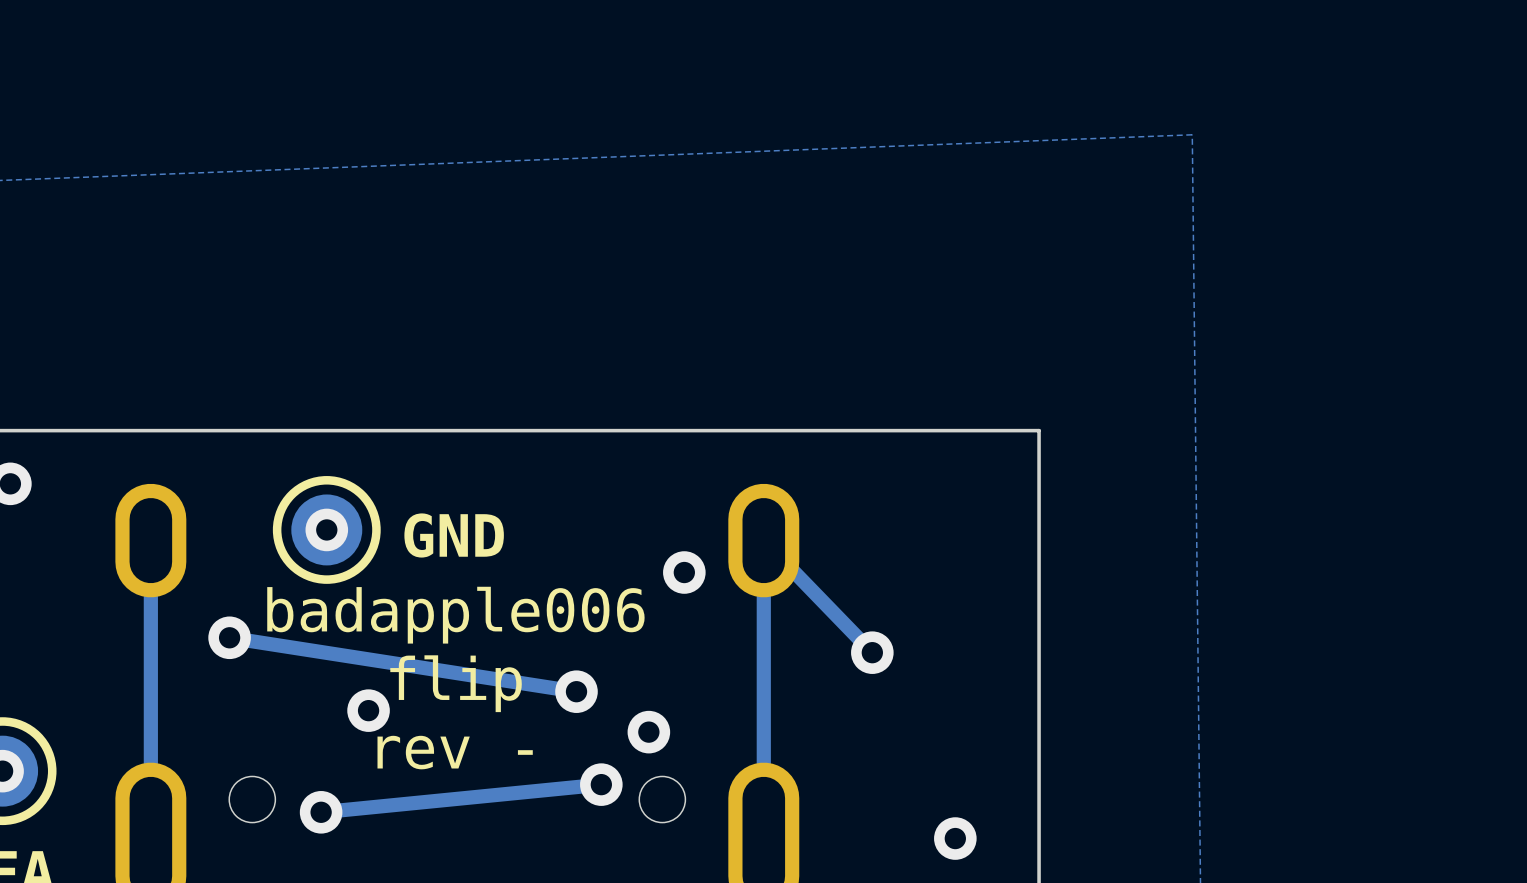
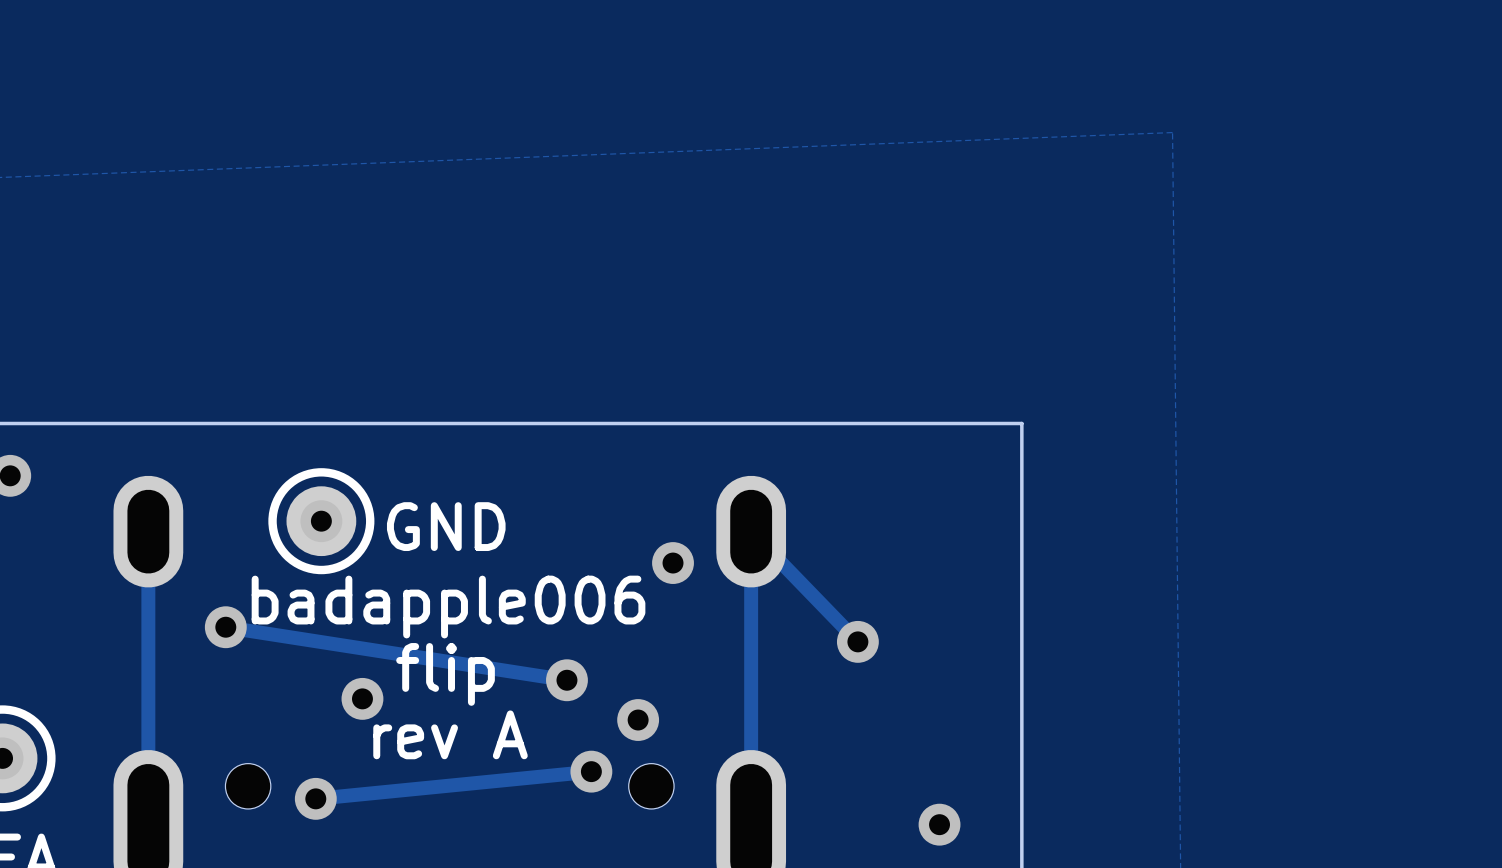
text: rev - (455, 752) -> rev A (450, 734)

